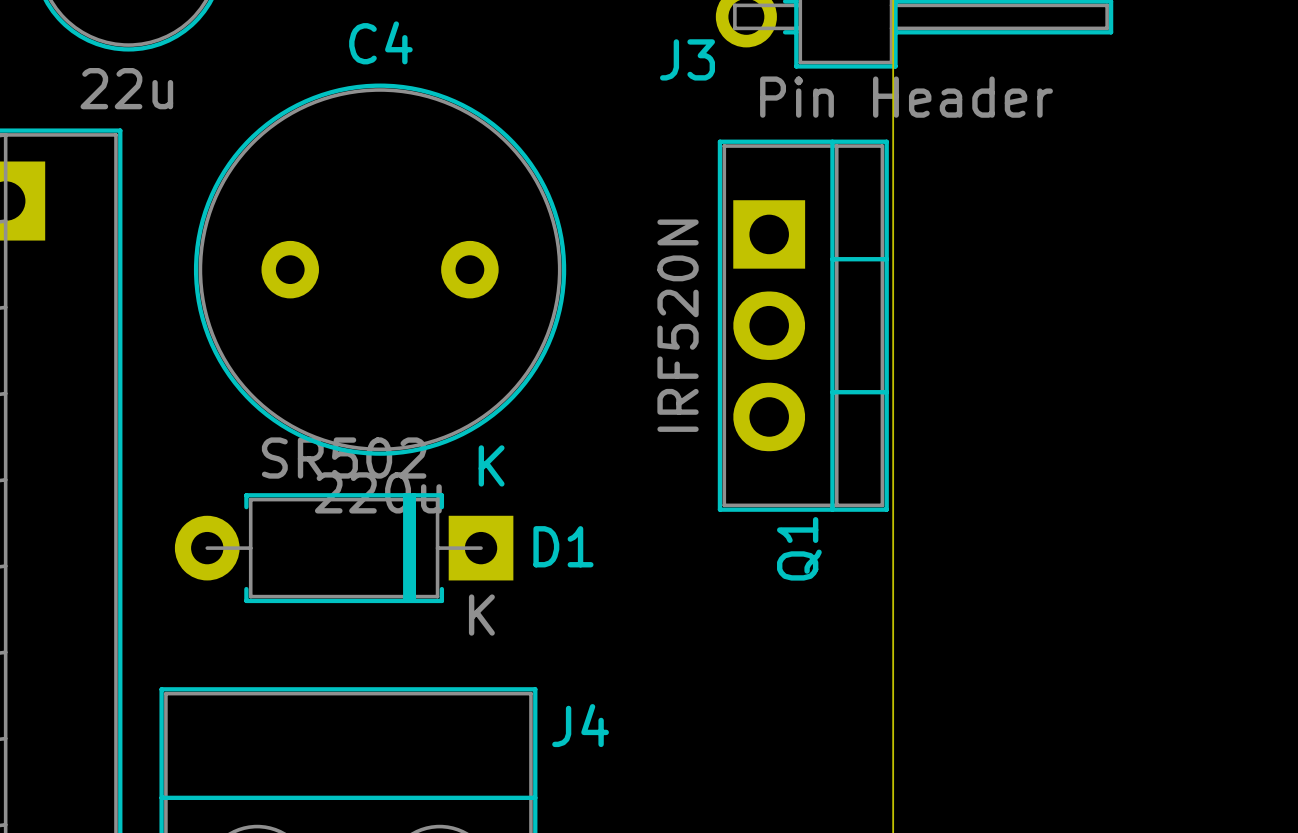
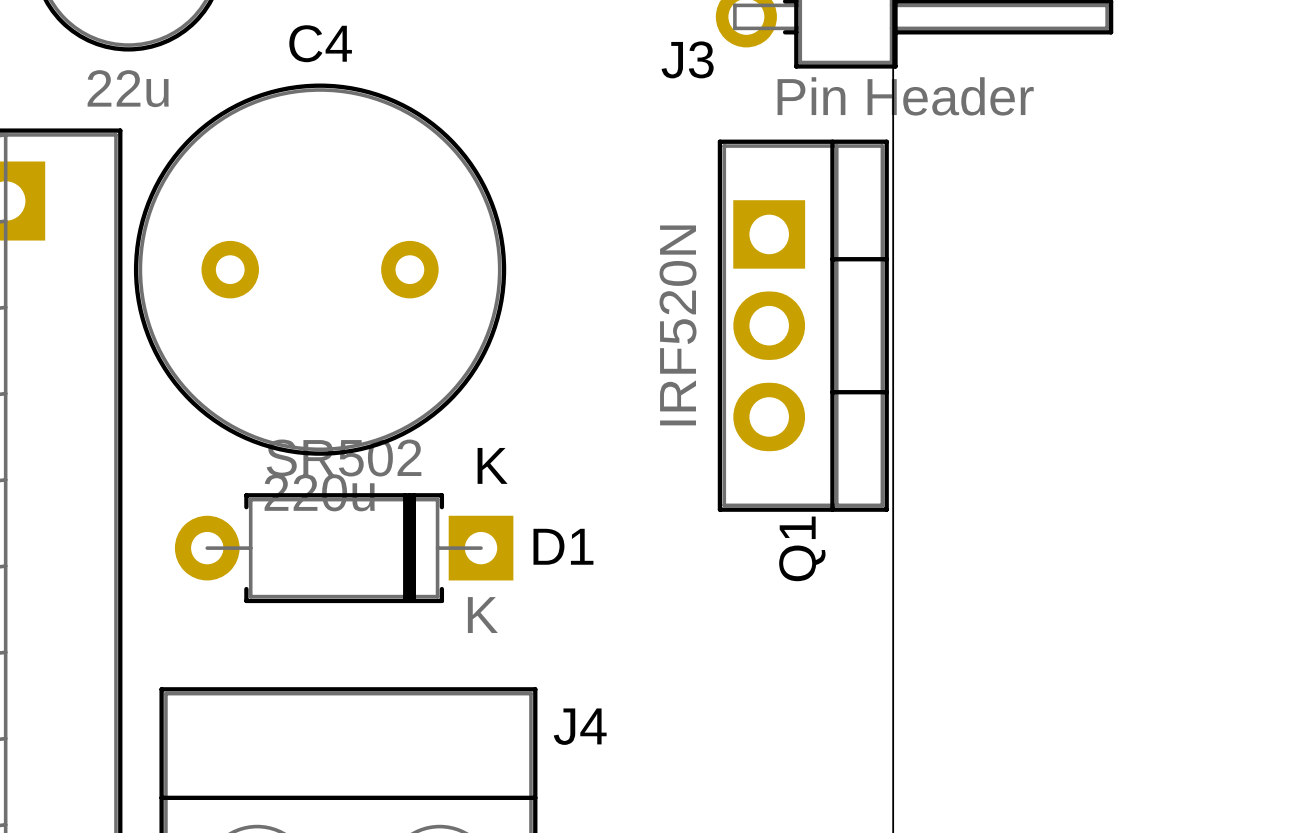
C4 position: (380, 269) -> (320, 269)

